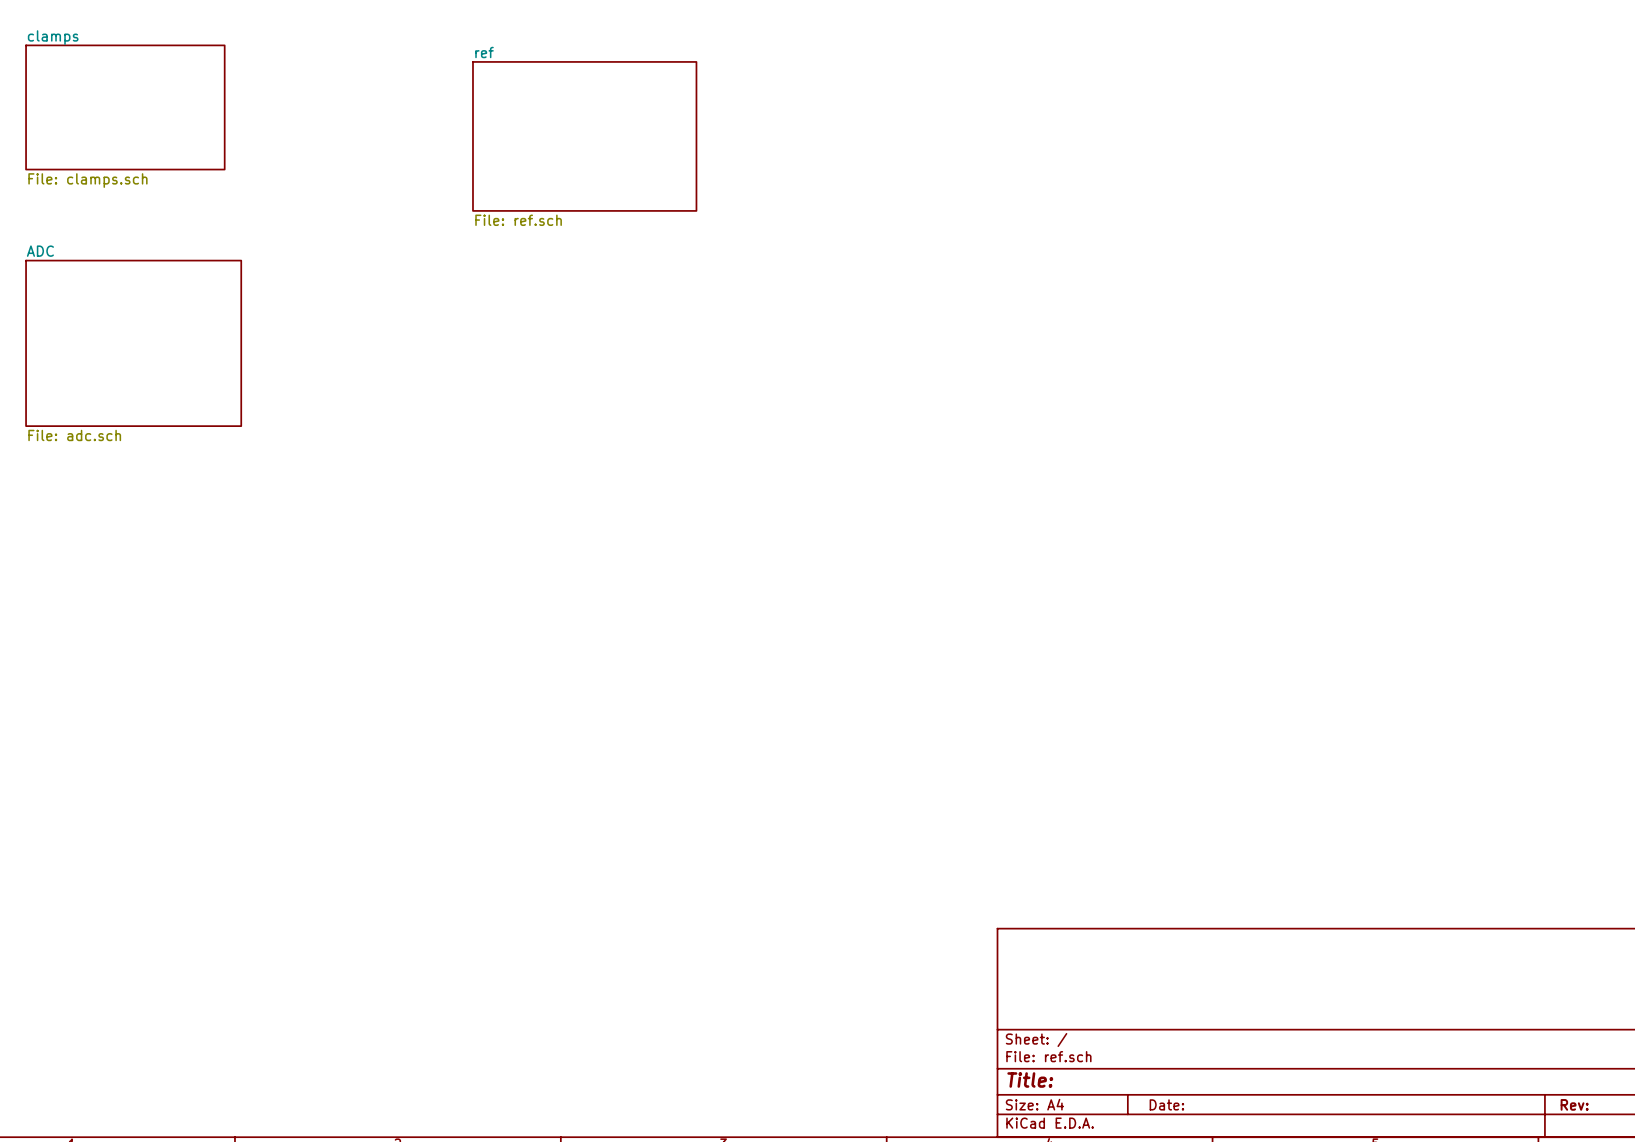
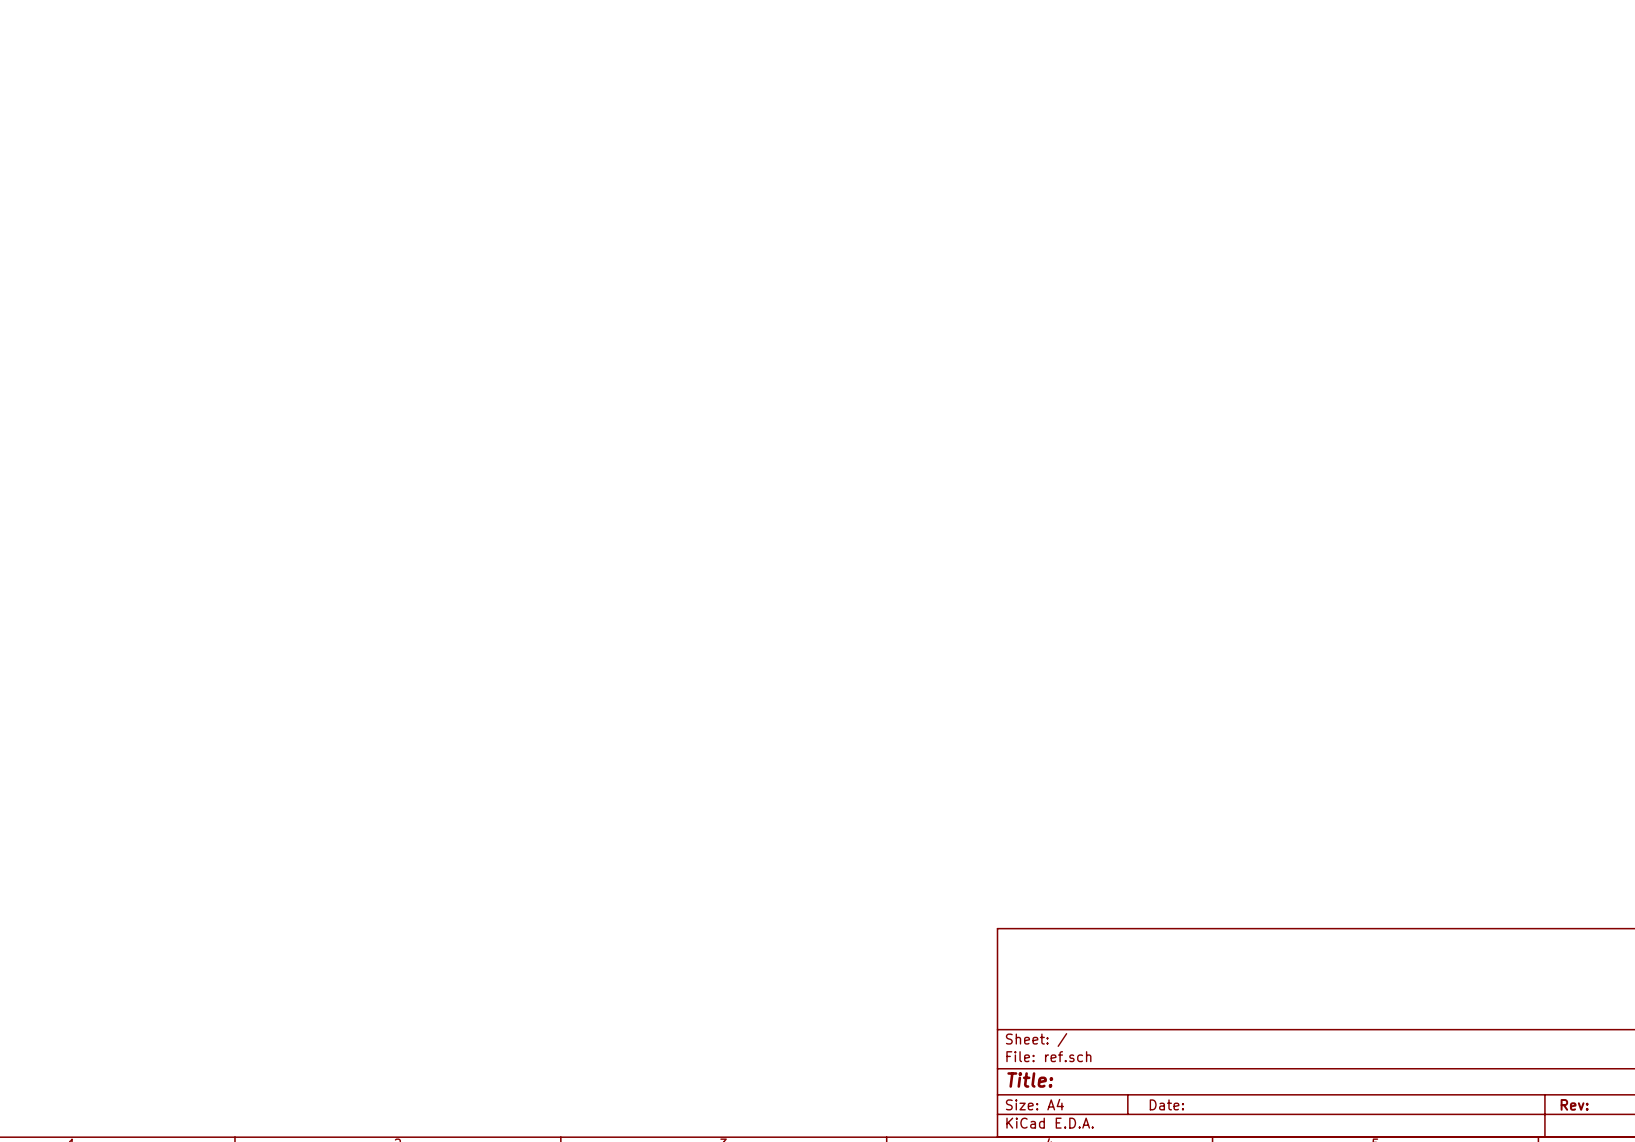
sheet clamps: File: clamps.sch (125, 107) -> none
sheet ref: File: ref.sch (584, 136) -> none
sheet ADC: File: adc.sch (133, 343) -> none

